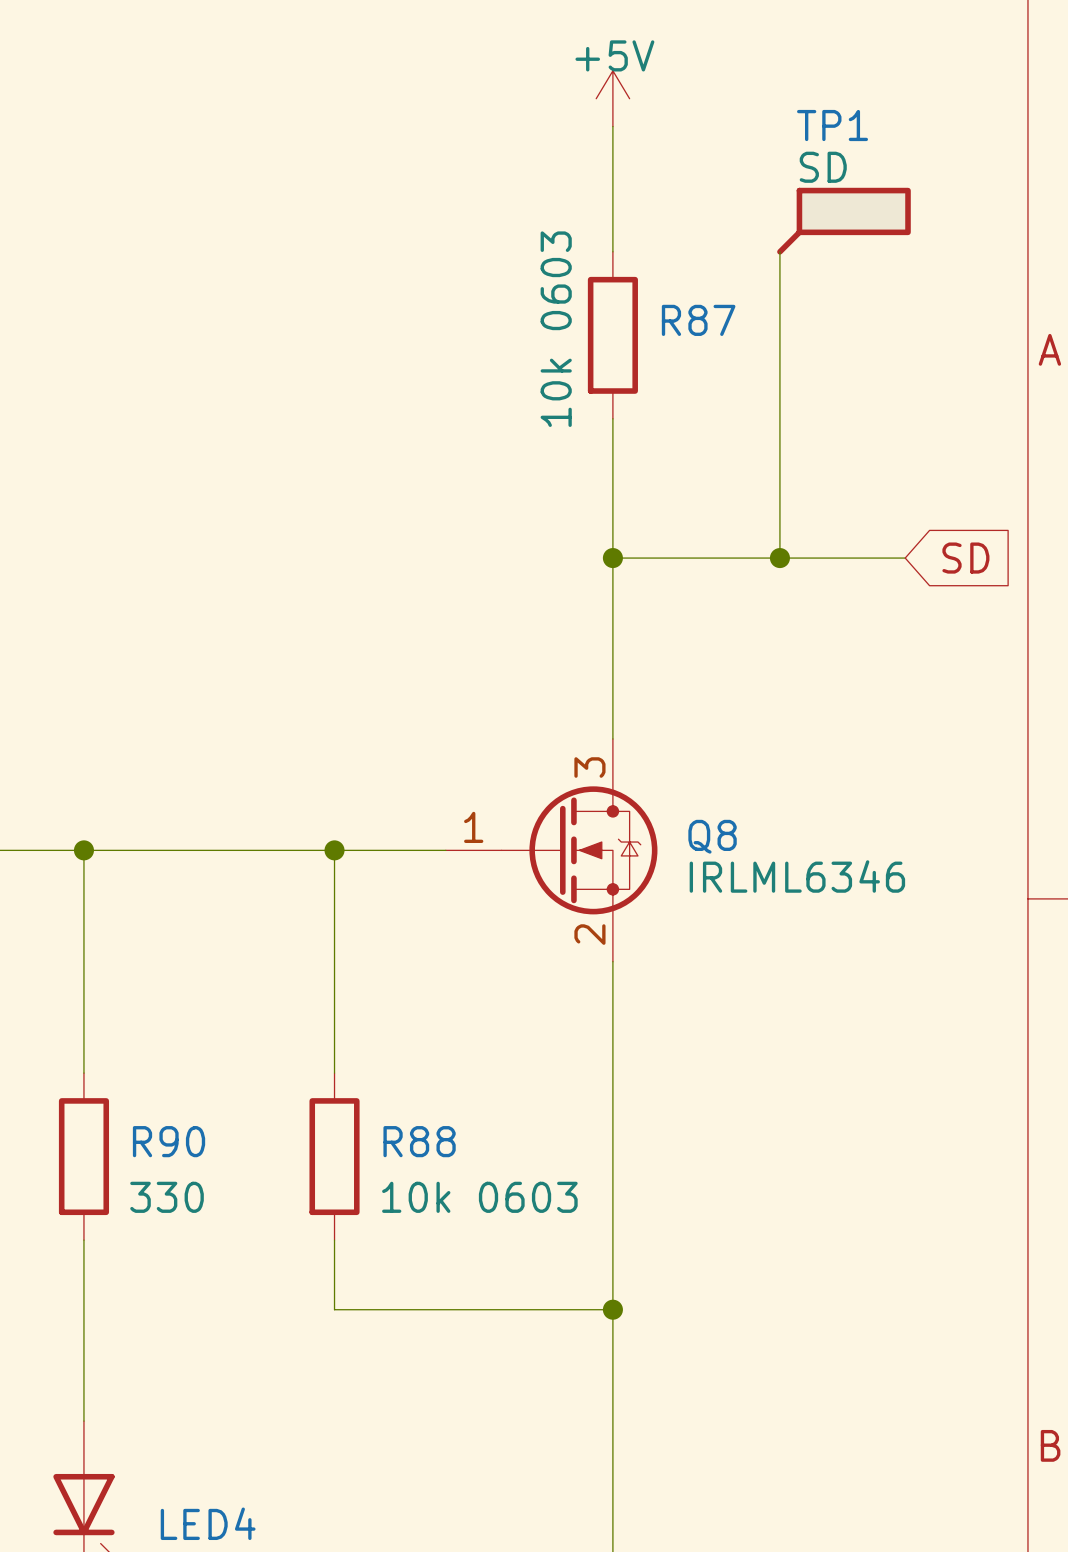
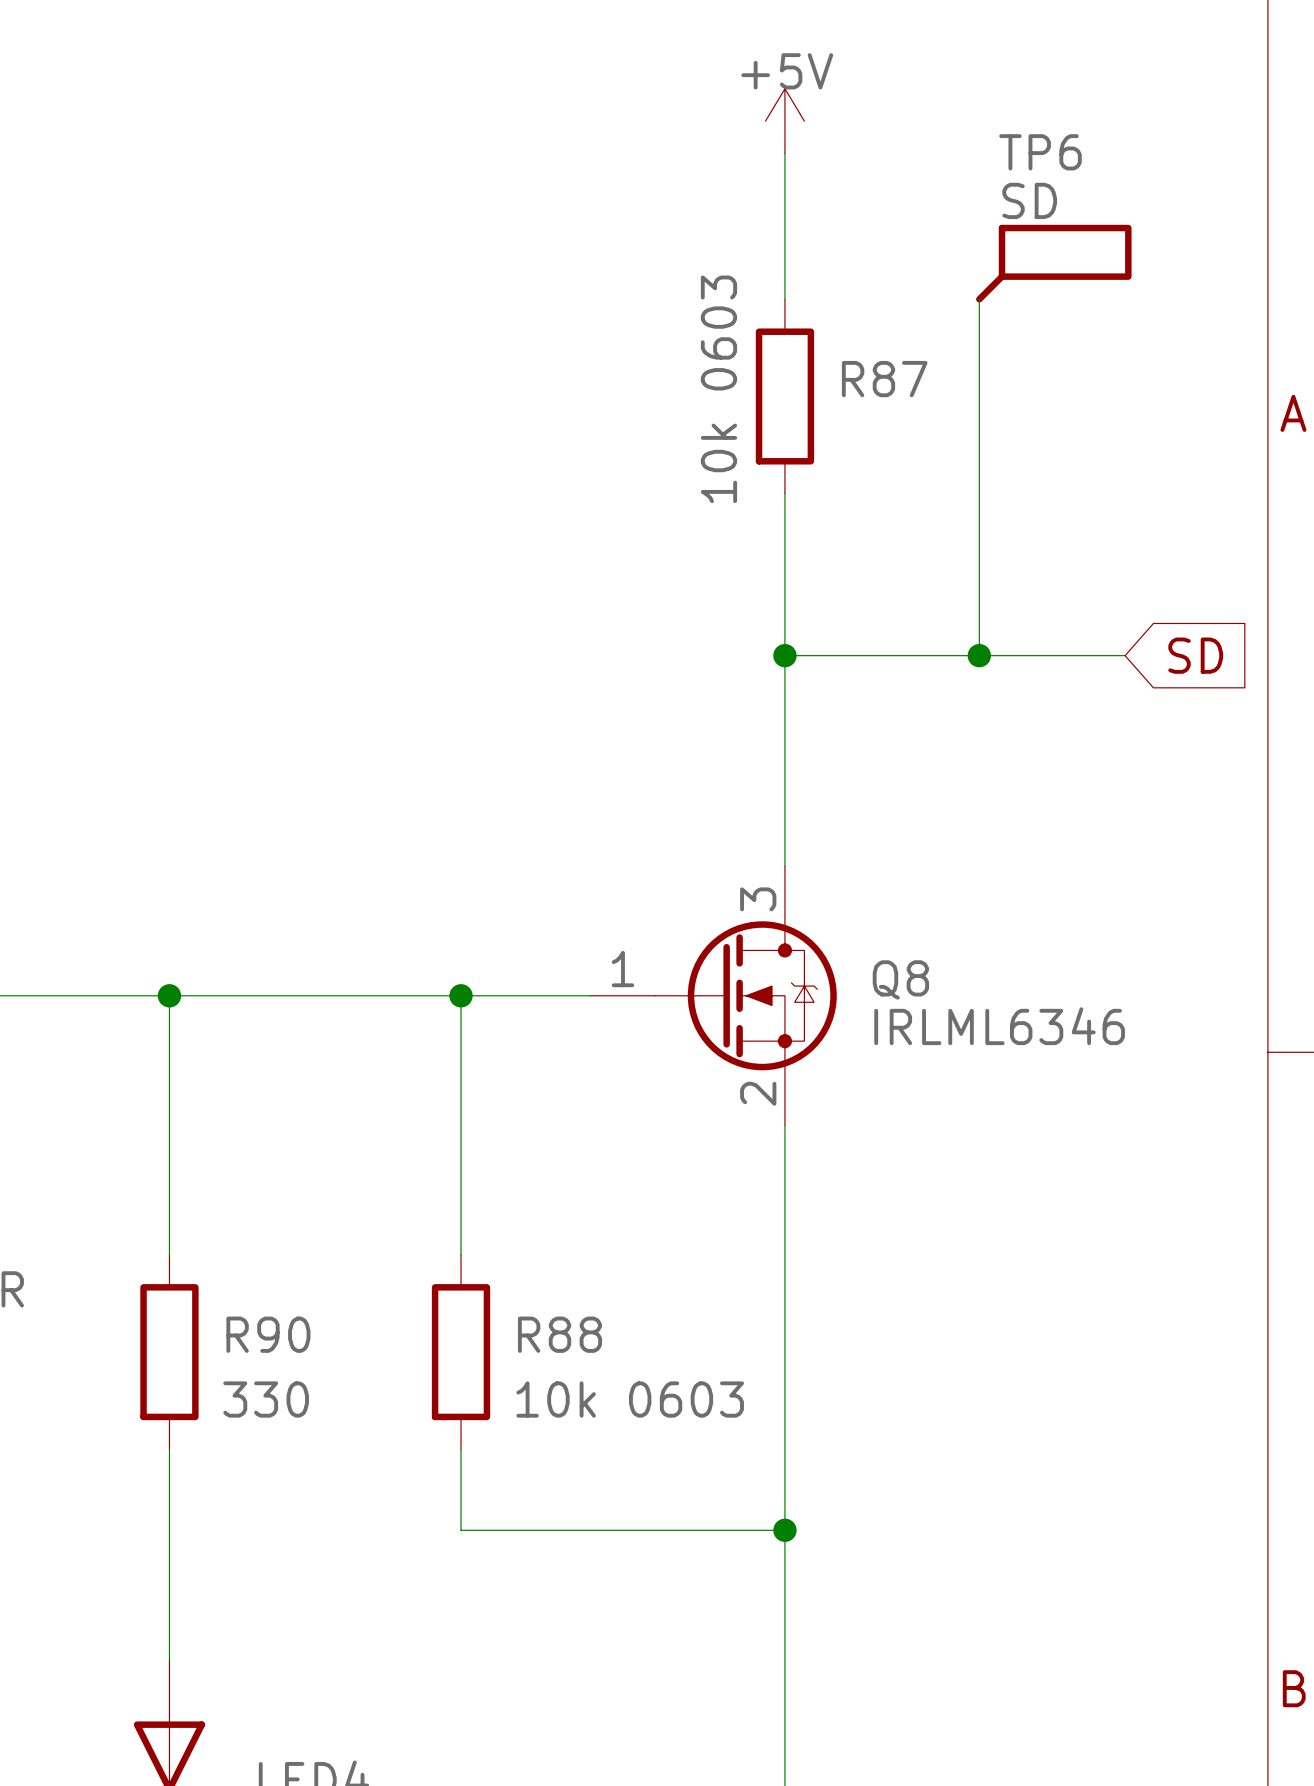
TP1 name: TP1 (832, 125) -> TP6 (1040, 152)

